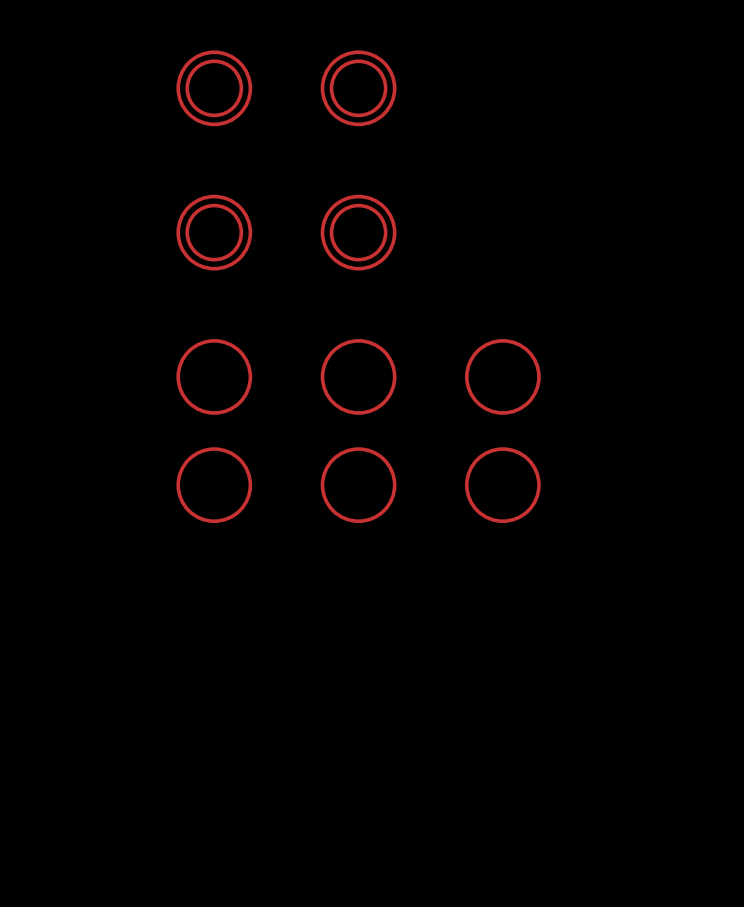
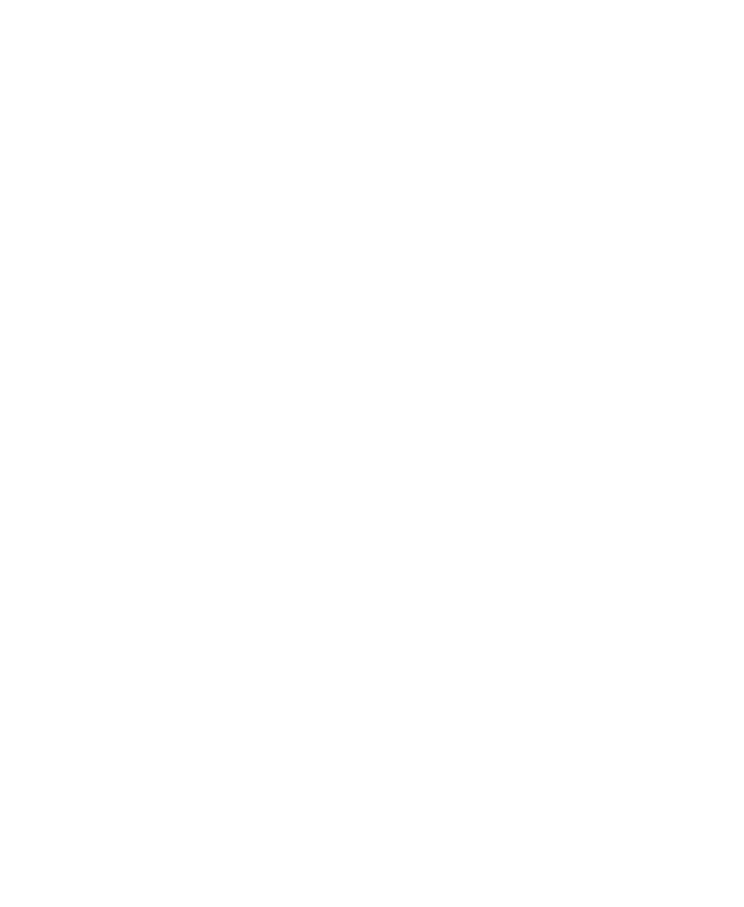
part: (214, 88) -> none
part: (358, 88) -> none
part: (214, 232) -> none
part: (358, 232) -> none
part: (214, 376) -> none
part: (358, 376) -> none
part: (502, 376) -> none
part: (214, 485) -> none
part: (358, 485) -> none
part: (502, 485) -> none

